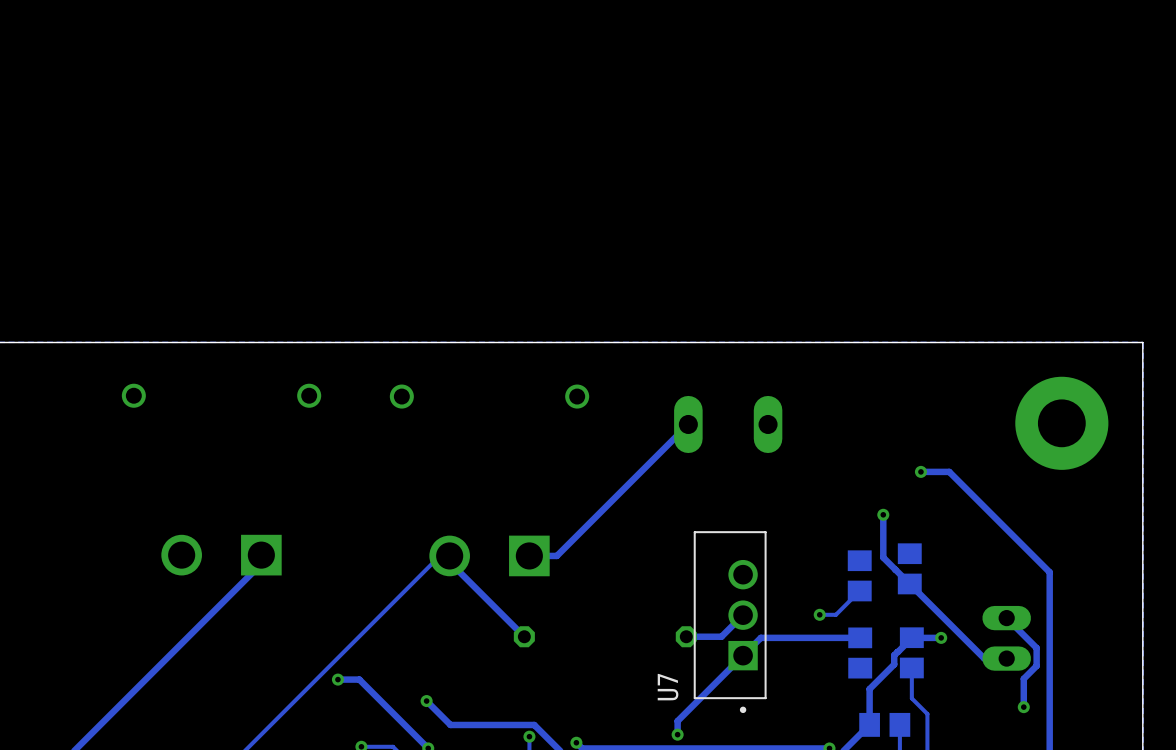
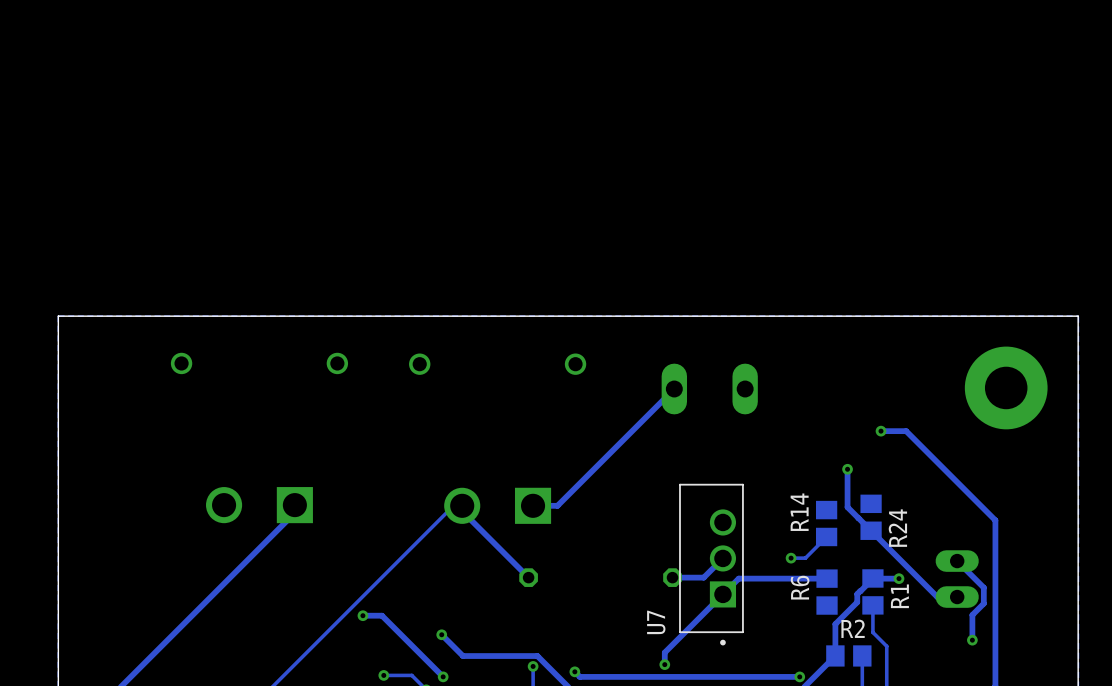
R14 name: none -> R14 (799, 512)
R24 name: none -> R24 (897, 528)
R6 name: none -> R6 (800, 587)
R1 name: none -> R1 (899, 596)
R2 name: none -> R2 (853, 628)

